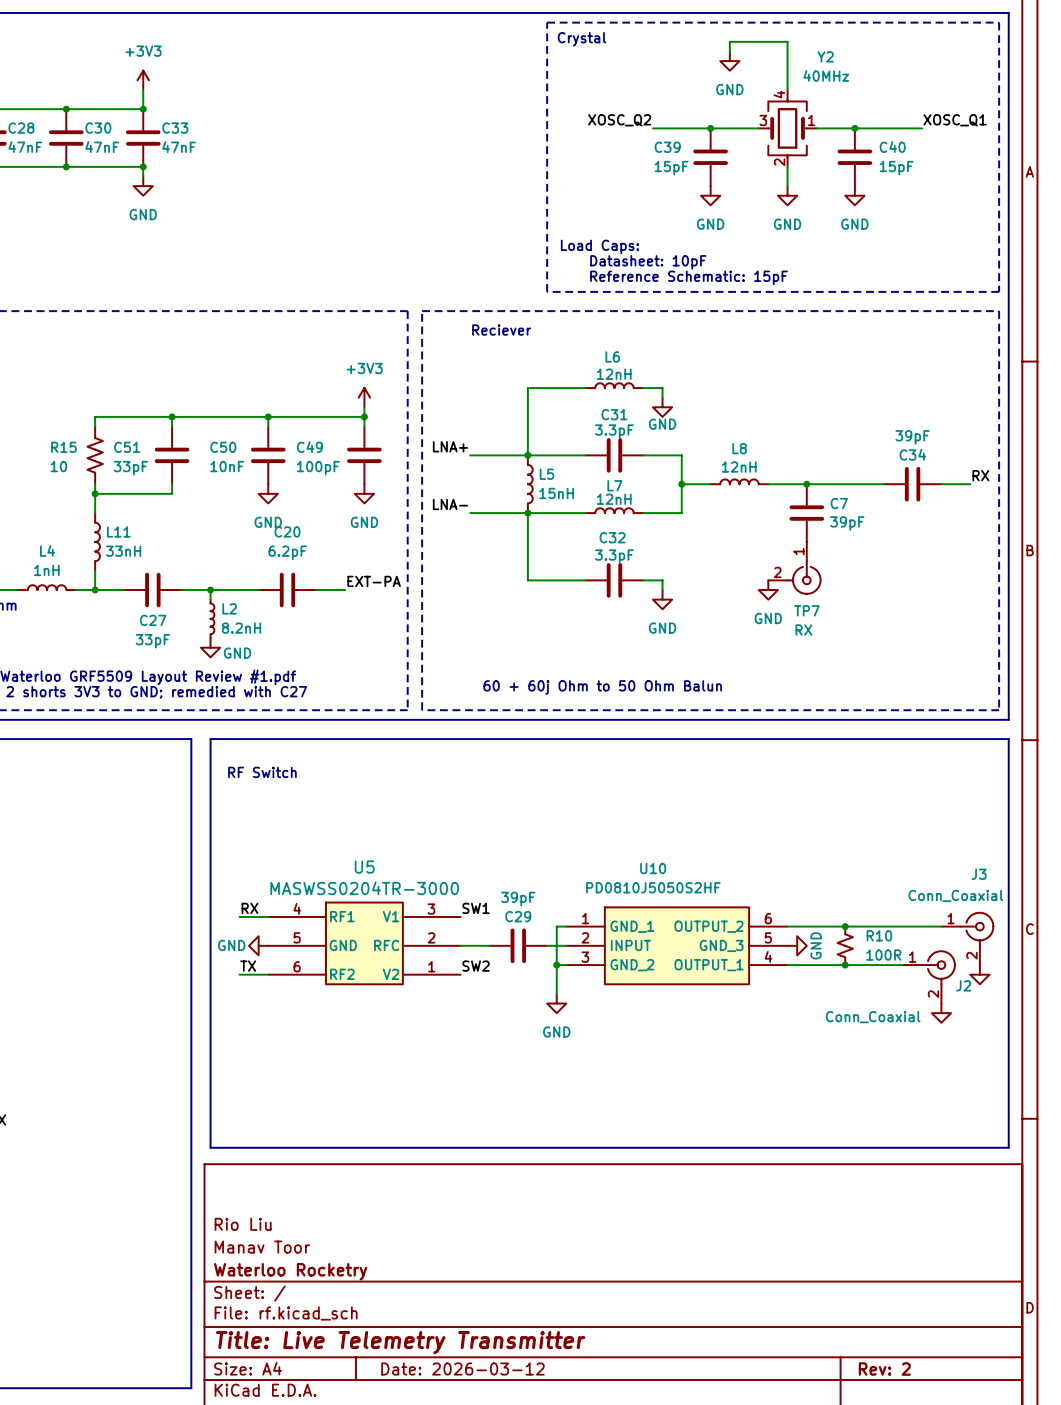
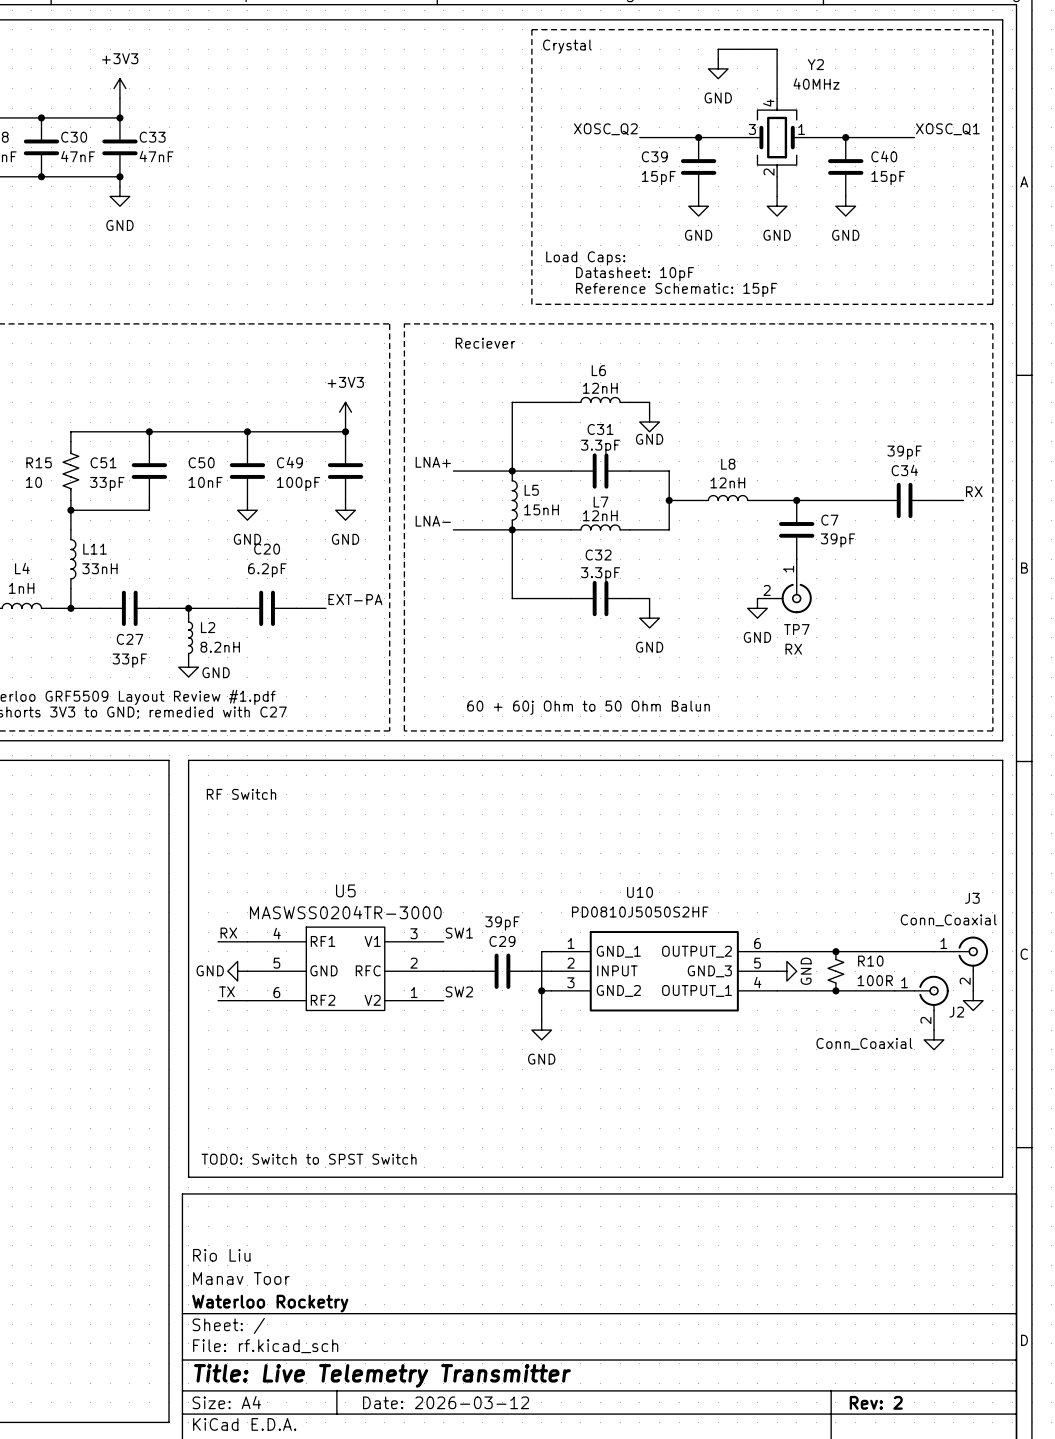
text: none -> TODO: Switch to SPST Switch (309, 1159)

